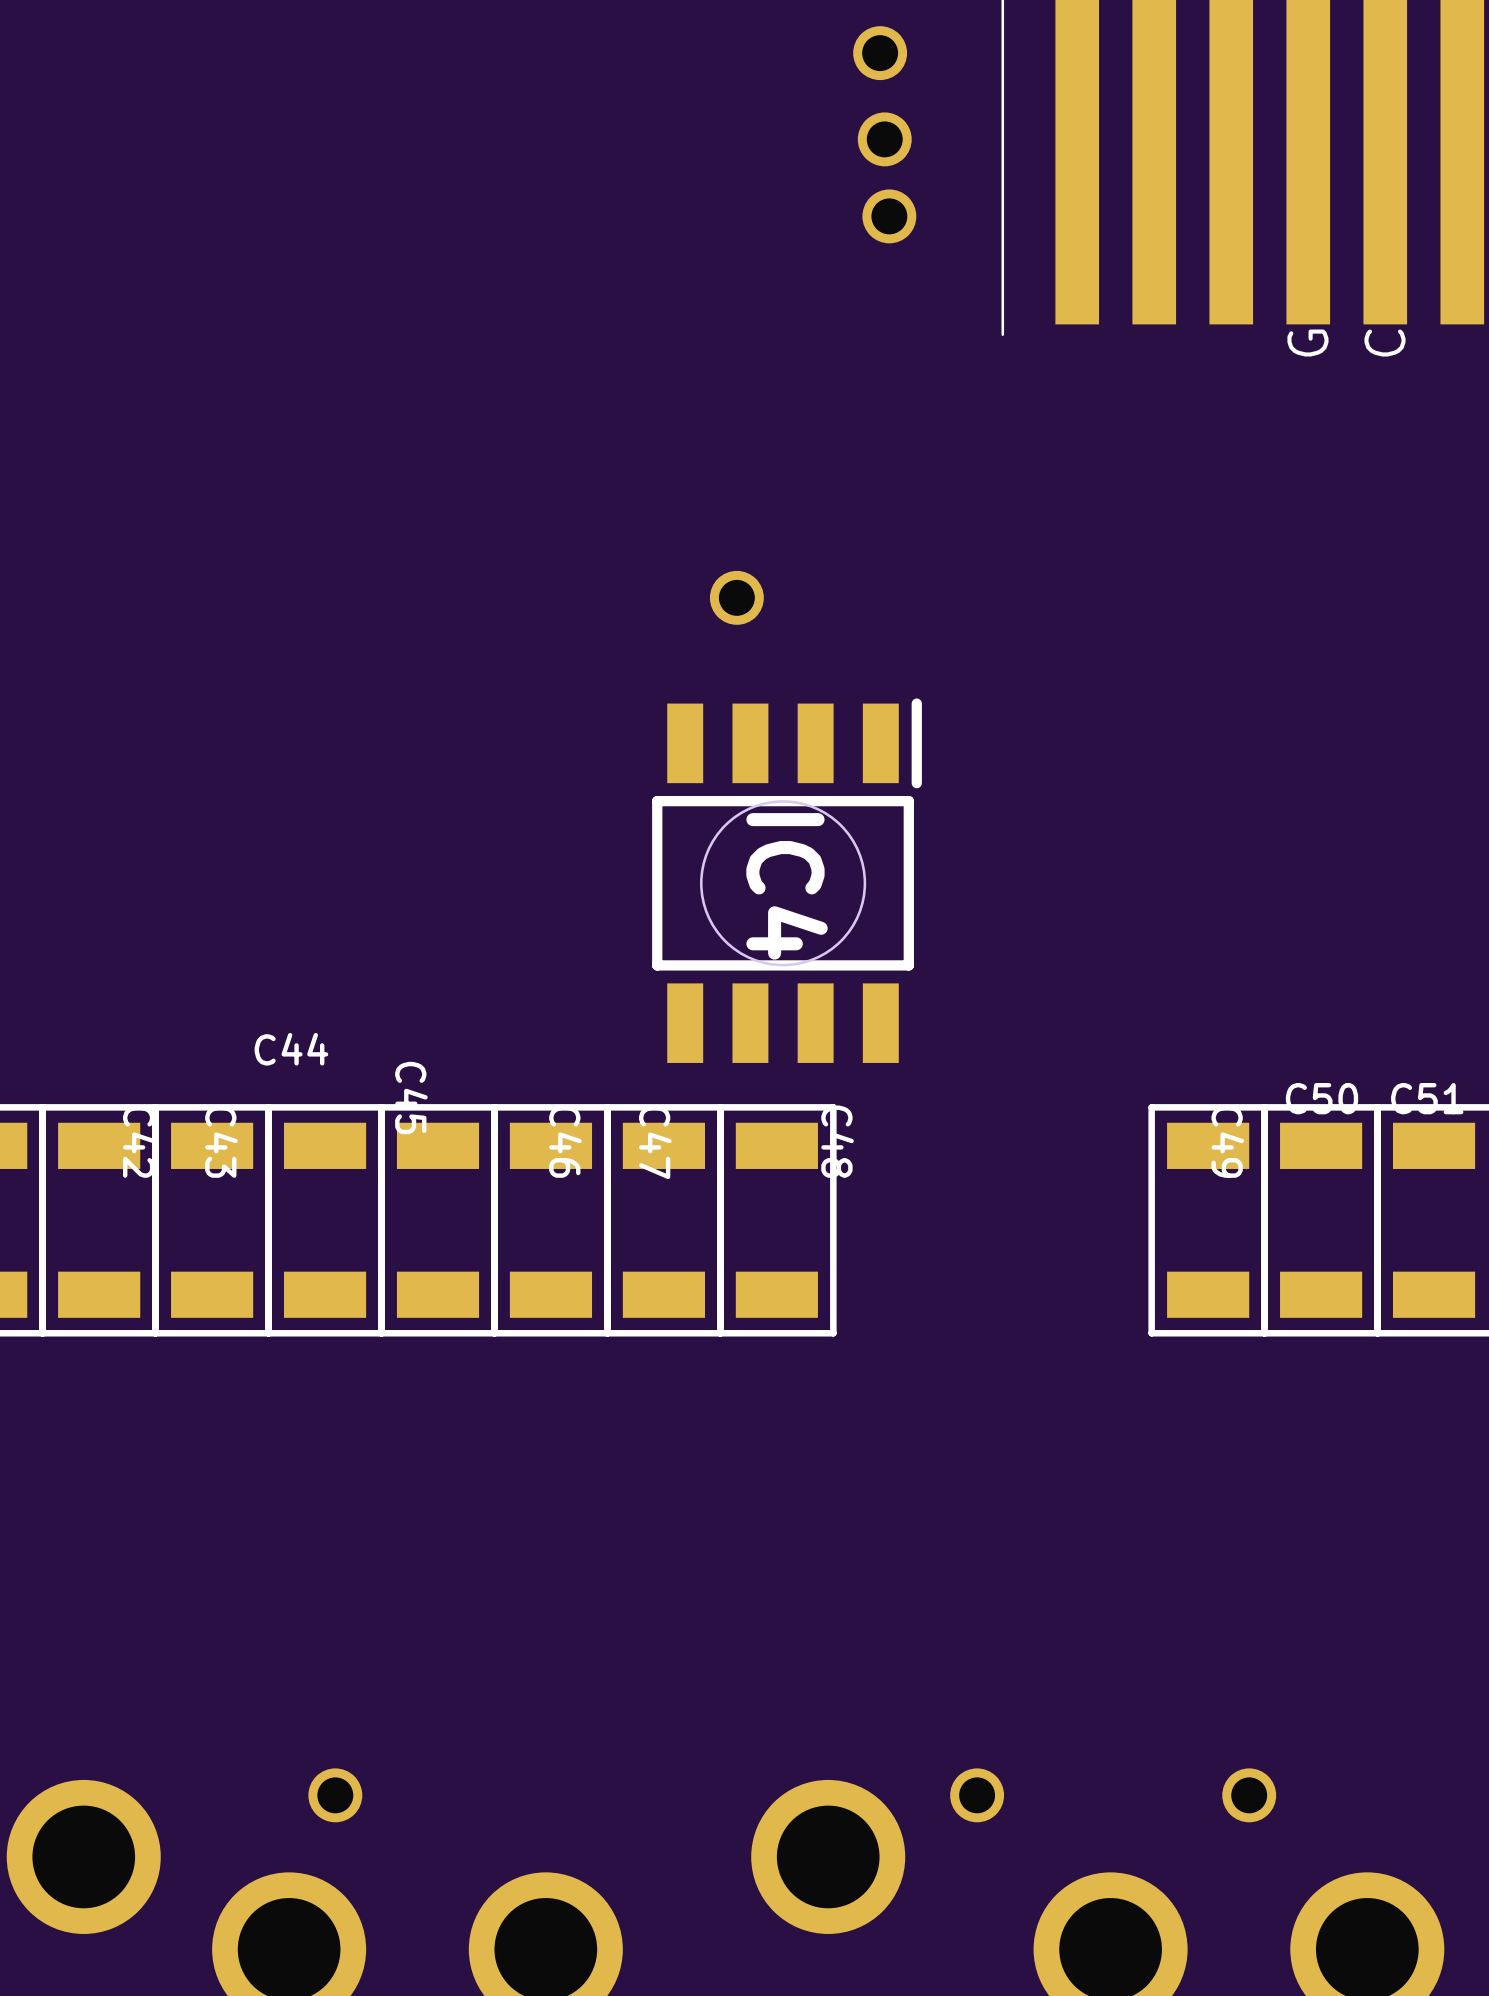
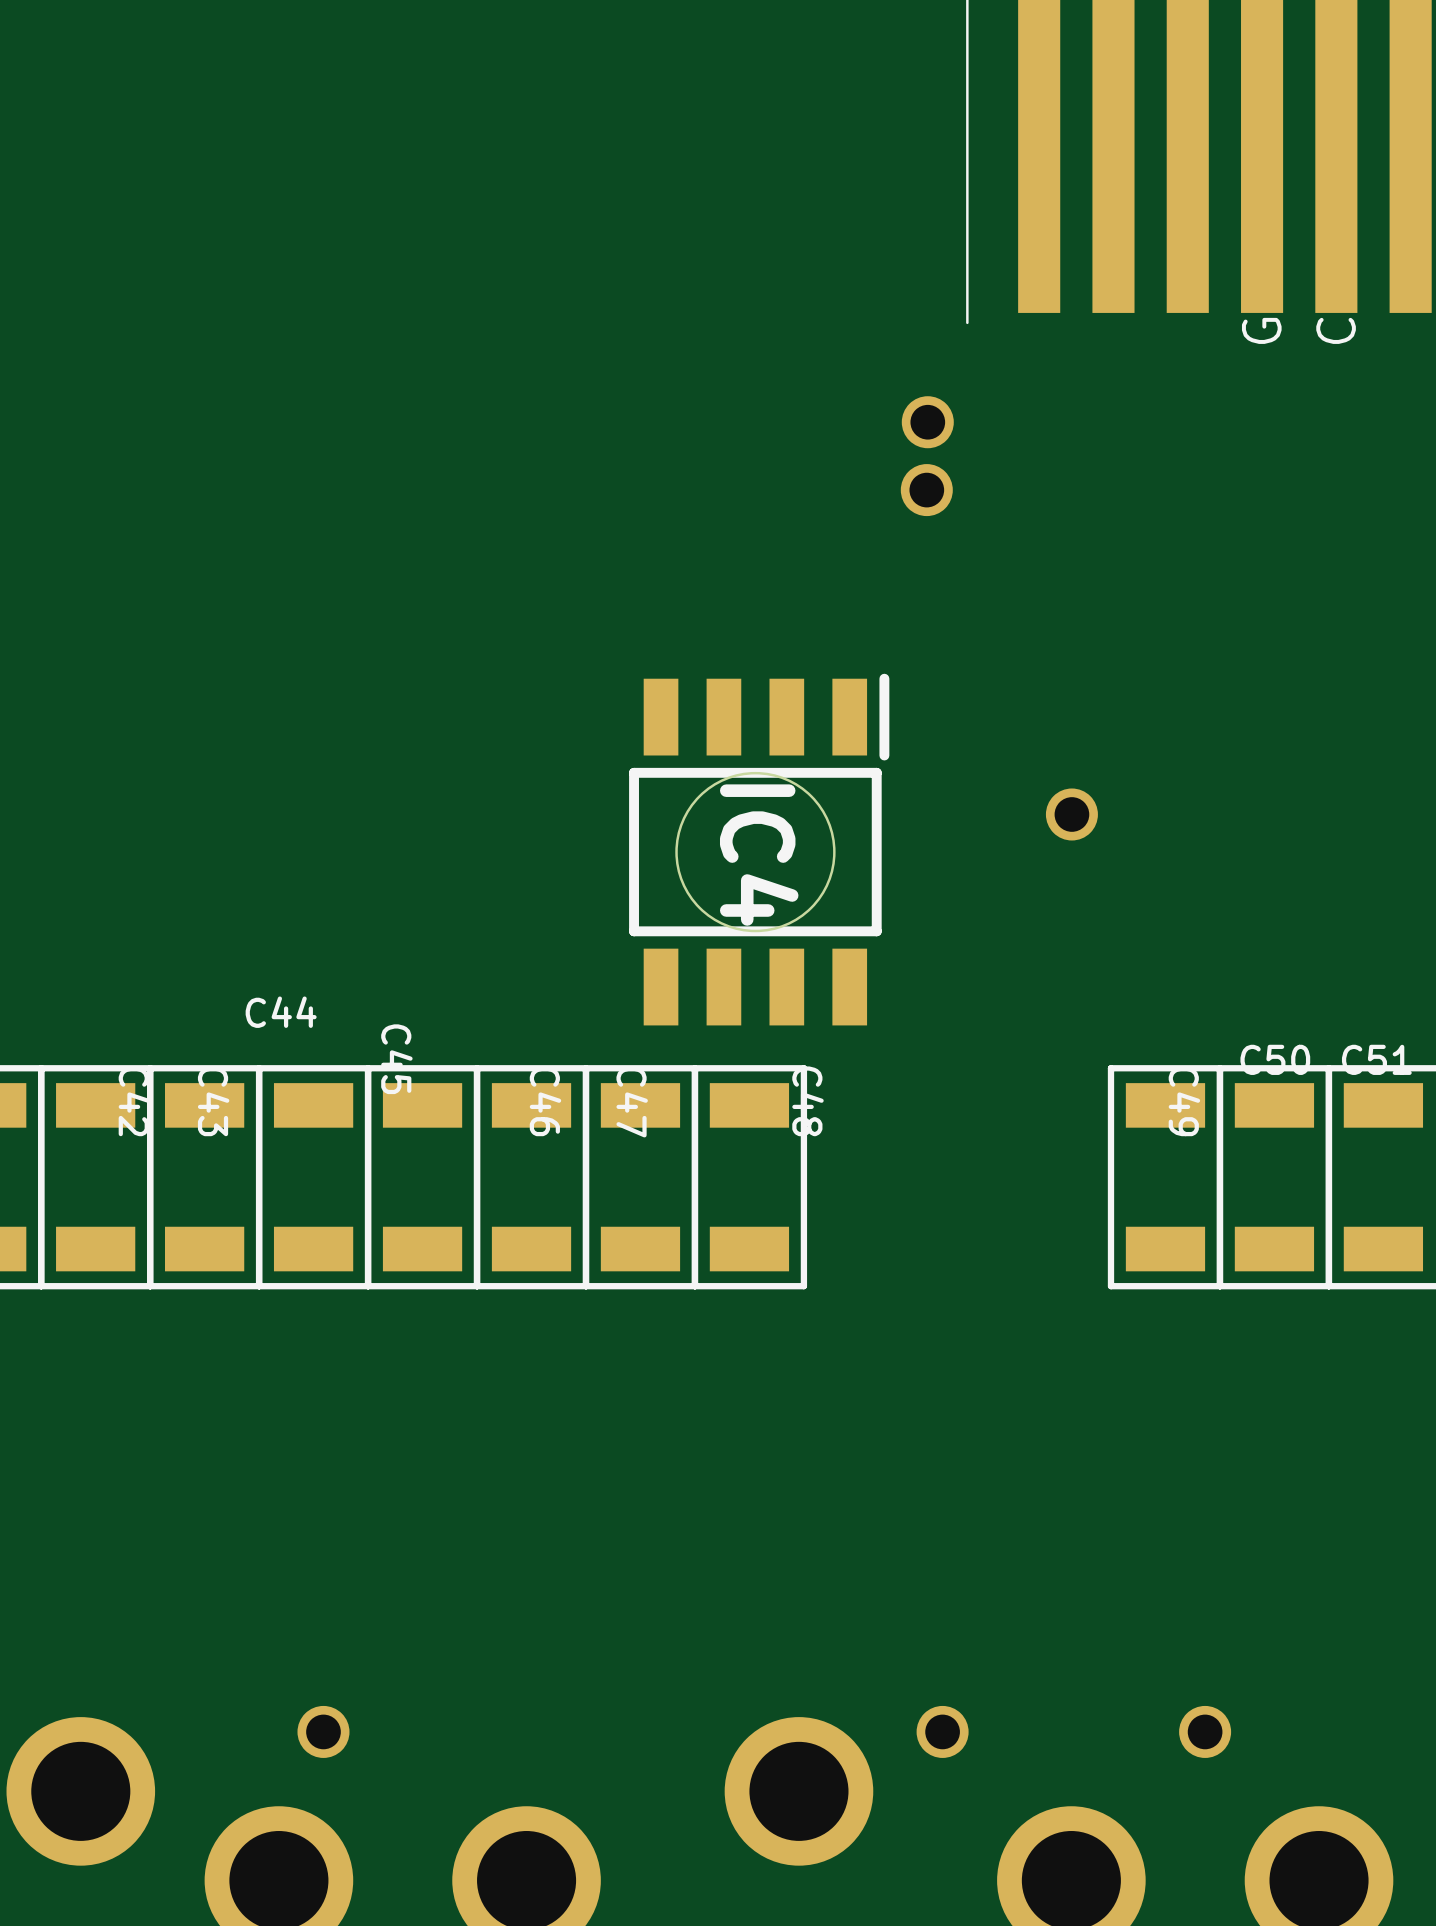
part: (880, 53) -> none
part: (884, 139) -> none
part: (889, 216) -> none
part: none -> (927, 422)
part: none -> (926, 490)
part: (736, 597) -> none
part: none -> (1071, 814)

